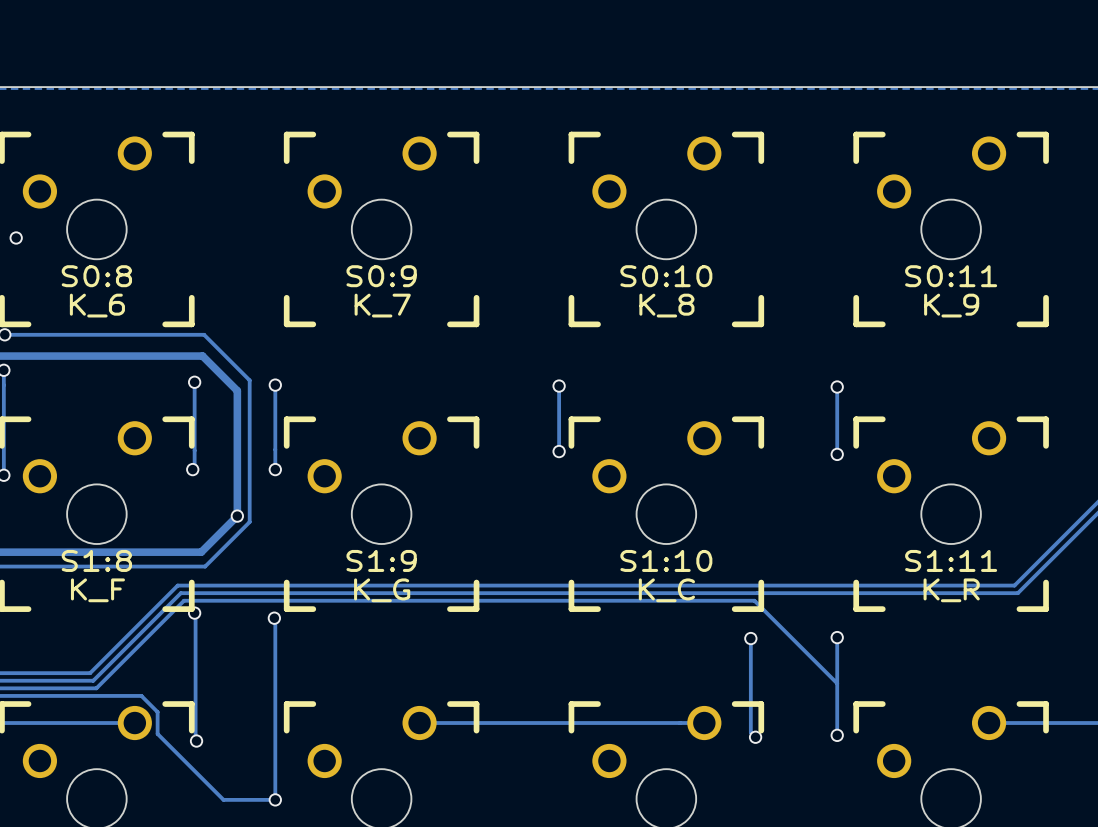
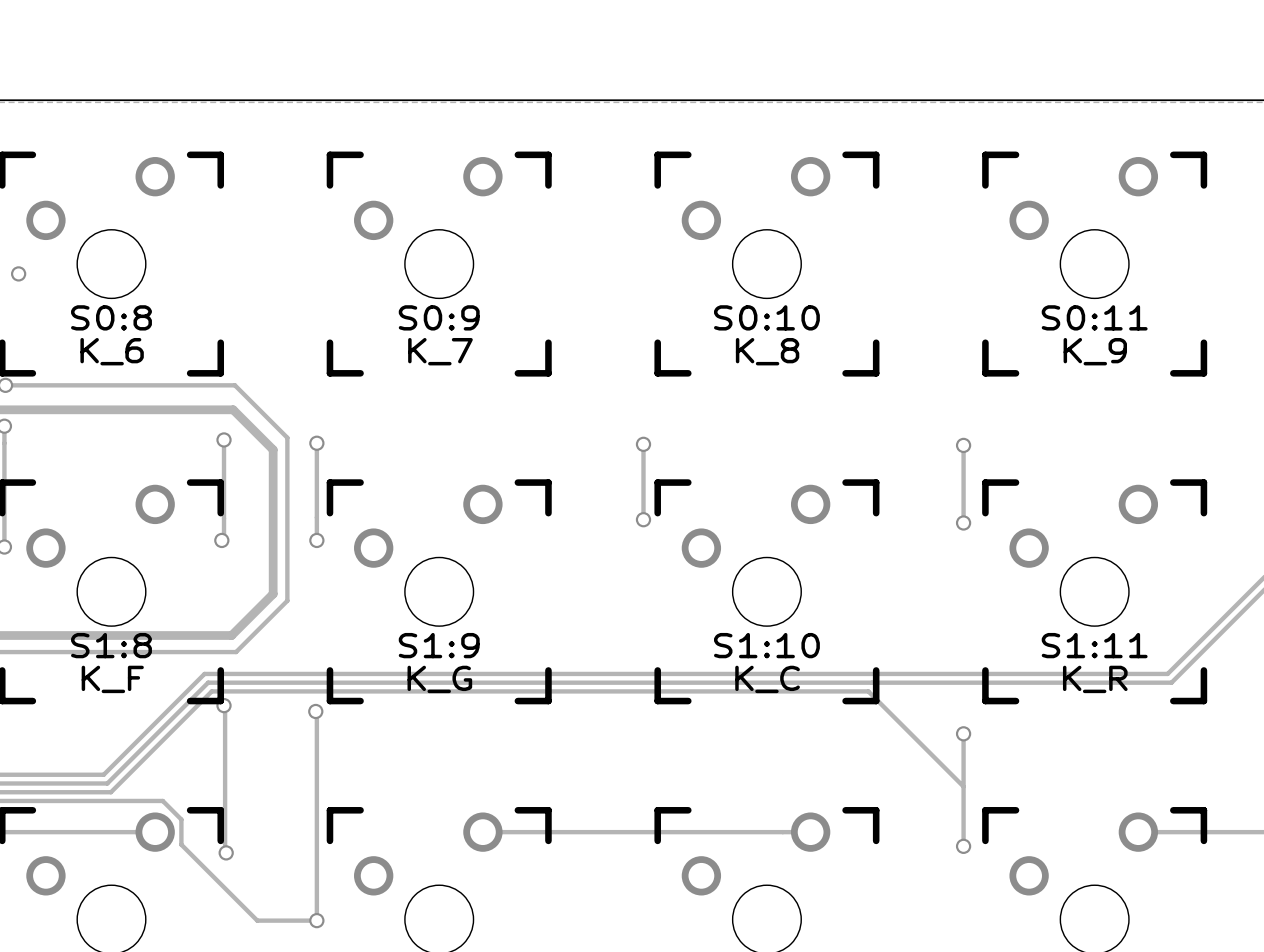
via: (237, 516) -> none
track: (750, 638) (750, 732) (755, 737) -> none
via: (750, 638) -> none
via: (755, 737) -> none

